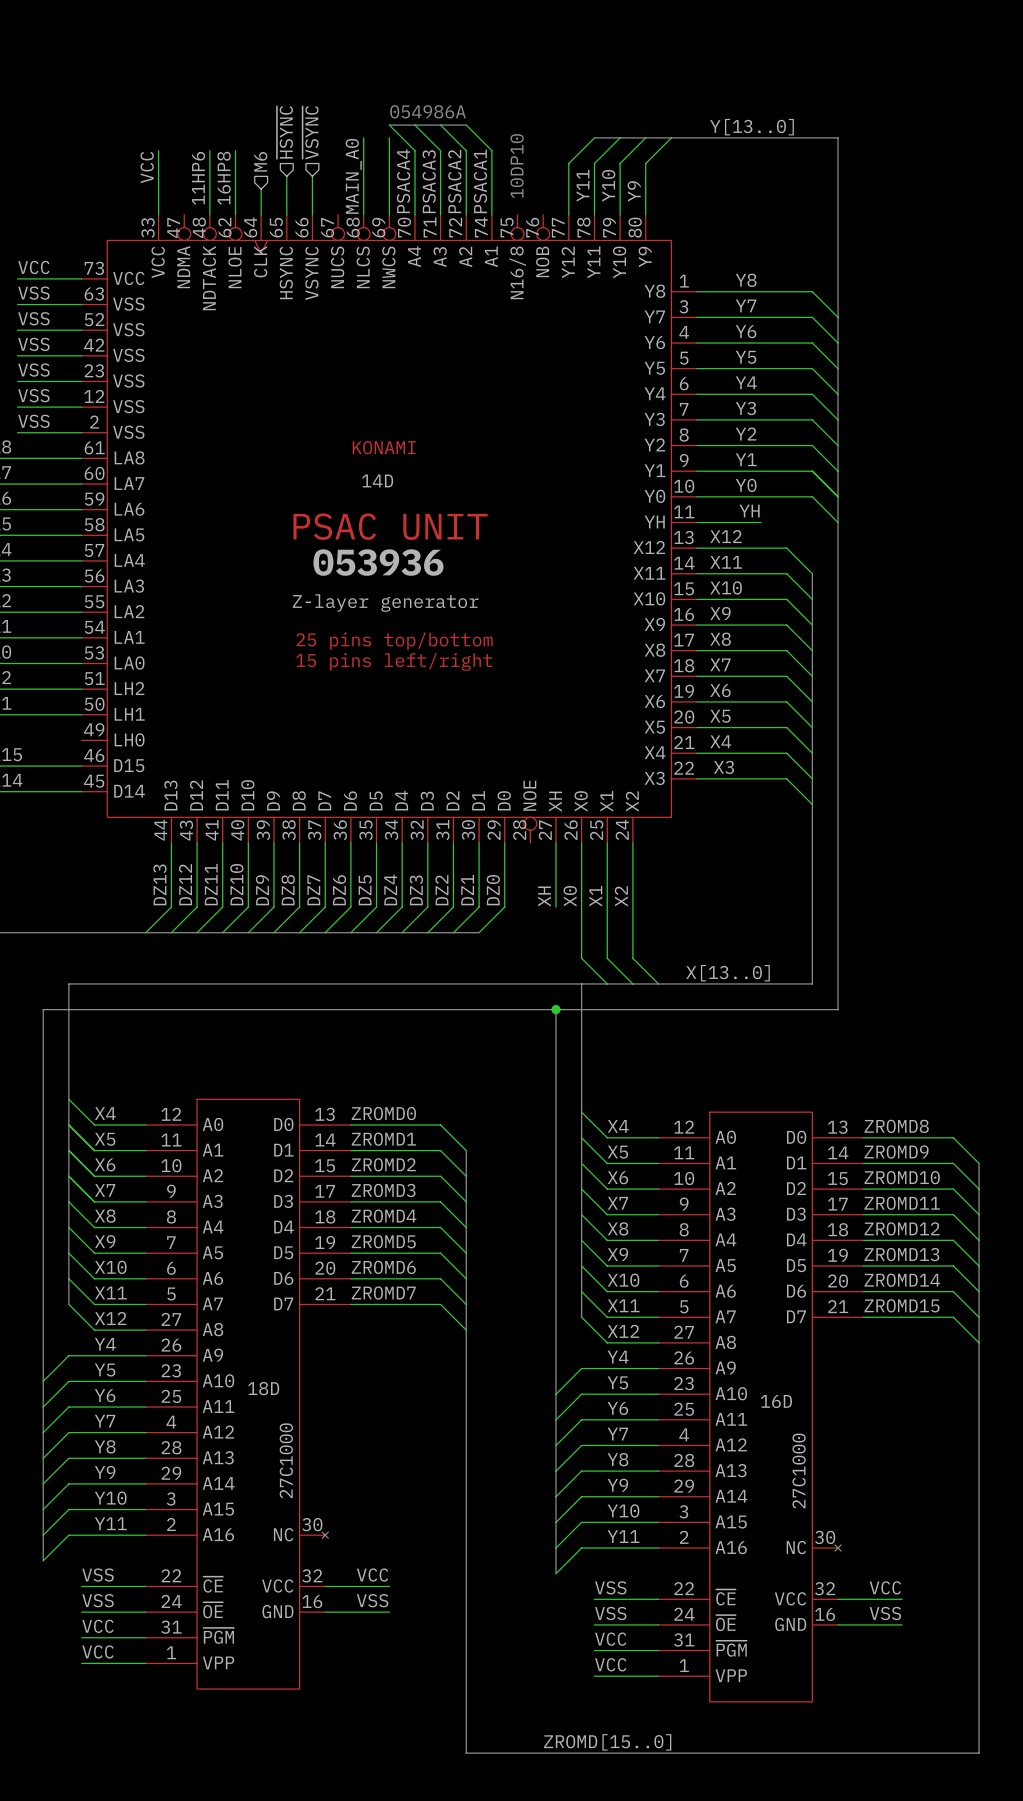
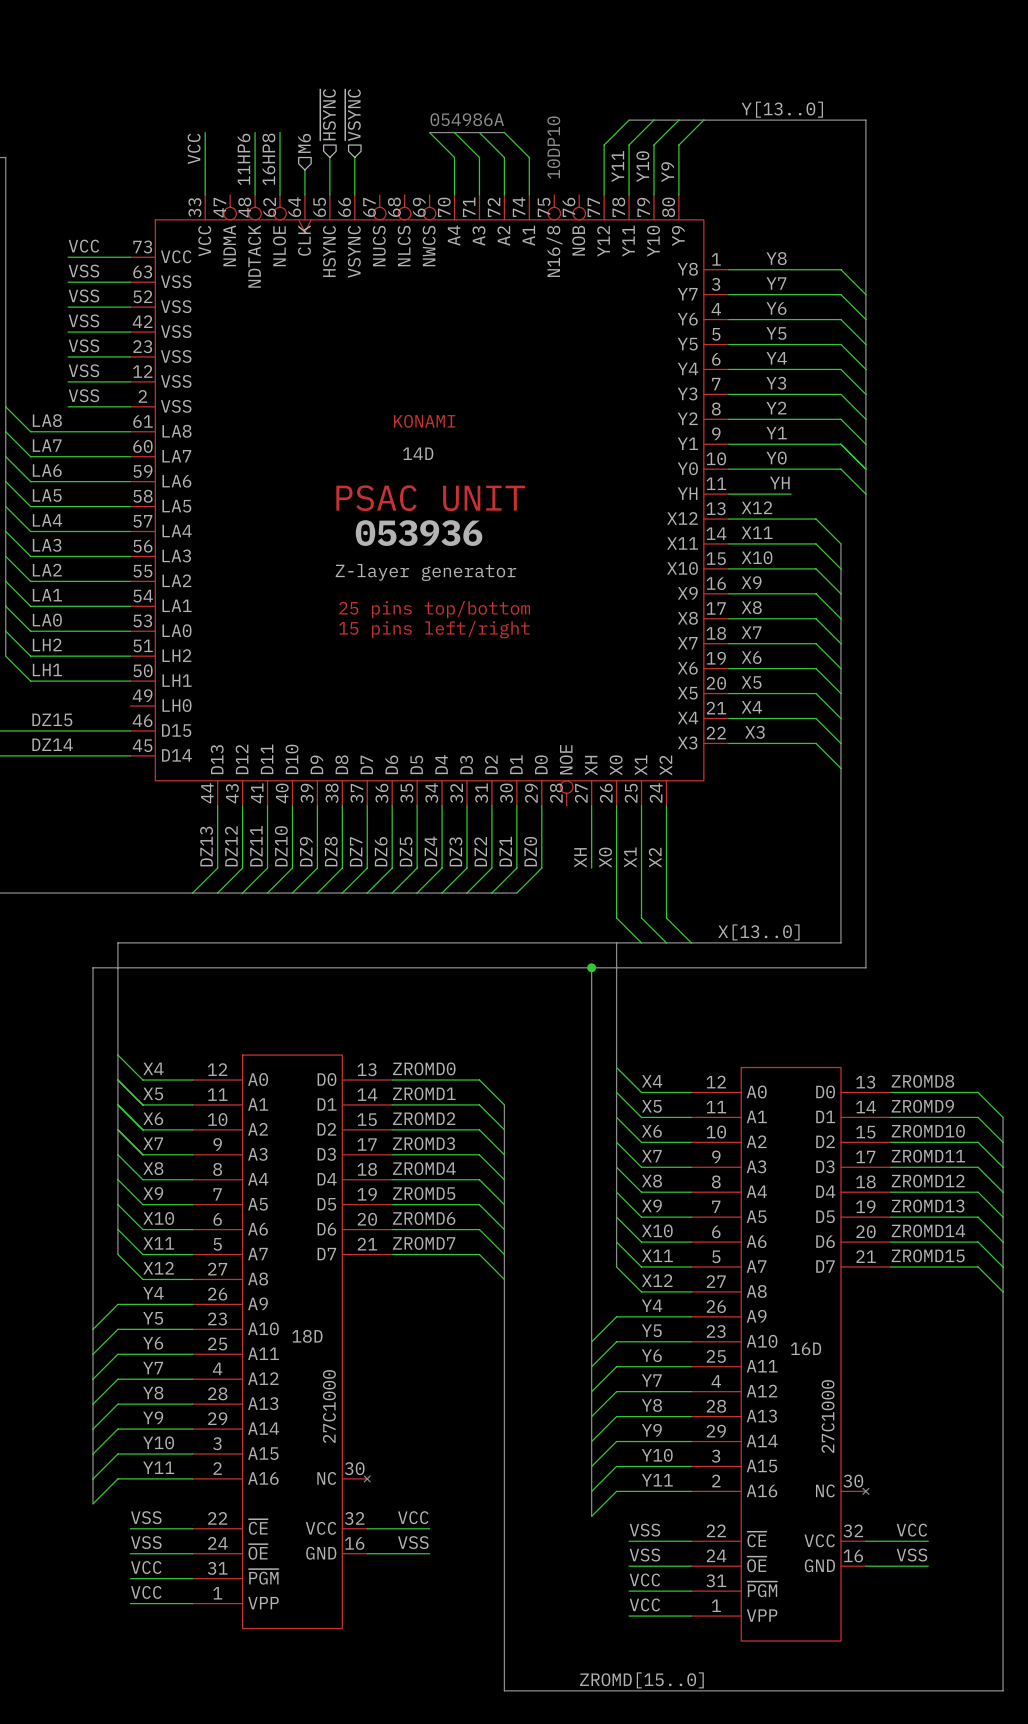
text position: 054986A (428, 111) -> 054986A (467, 119)
wire: (389, 125) (414, 150) (414, 176) -> (429, 132) (454, 157)
bus: (389, 125) (466, 125) -> (429, 132) (504, 132)
wire: (414, 125) (440, 150) (440, 176) -> (454, 132) (479, 157)
wire: (440, 125) (466, 150) (466, 176) -> (479, 132) (504, 157)
wire: (466, 125) (491, 150) (491, 176) -> (504, 132) (529, 157)
wire: (363, 137) (363, 214) -> none
wire: (389, 137) (389, 214) -> none
label: MAIN_A0 (353, 176) -> none
label: PSACA4 (403, 181) -> none
label: PSACA3 (429, 181) -> none
label: PSACA2 (454, 181) -> none
label: PSACA1 (480, 181) -> none

